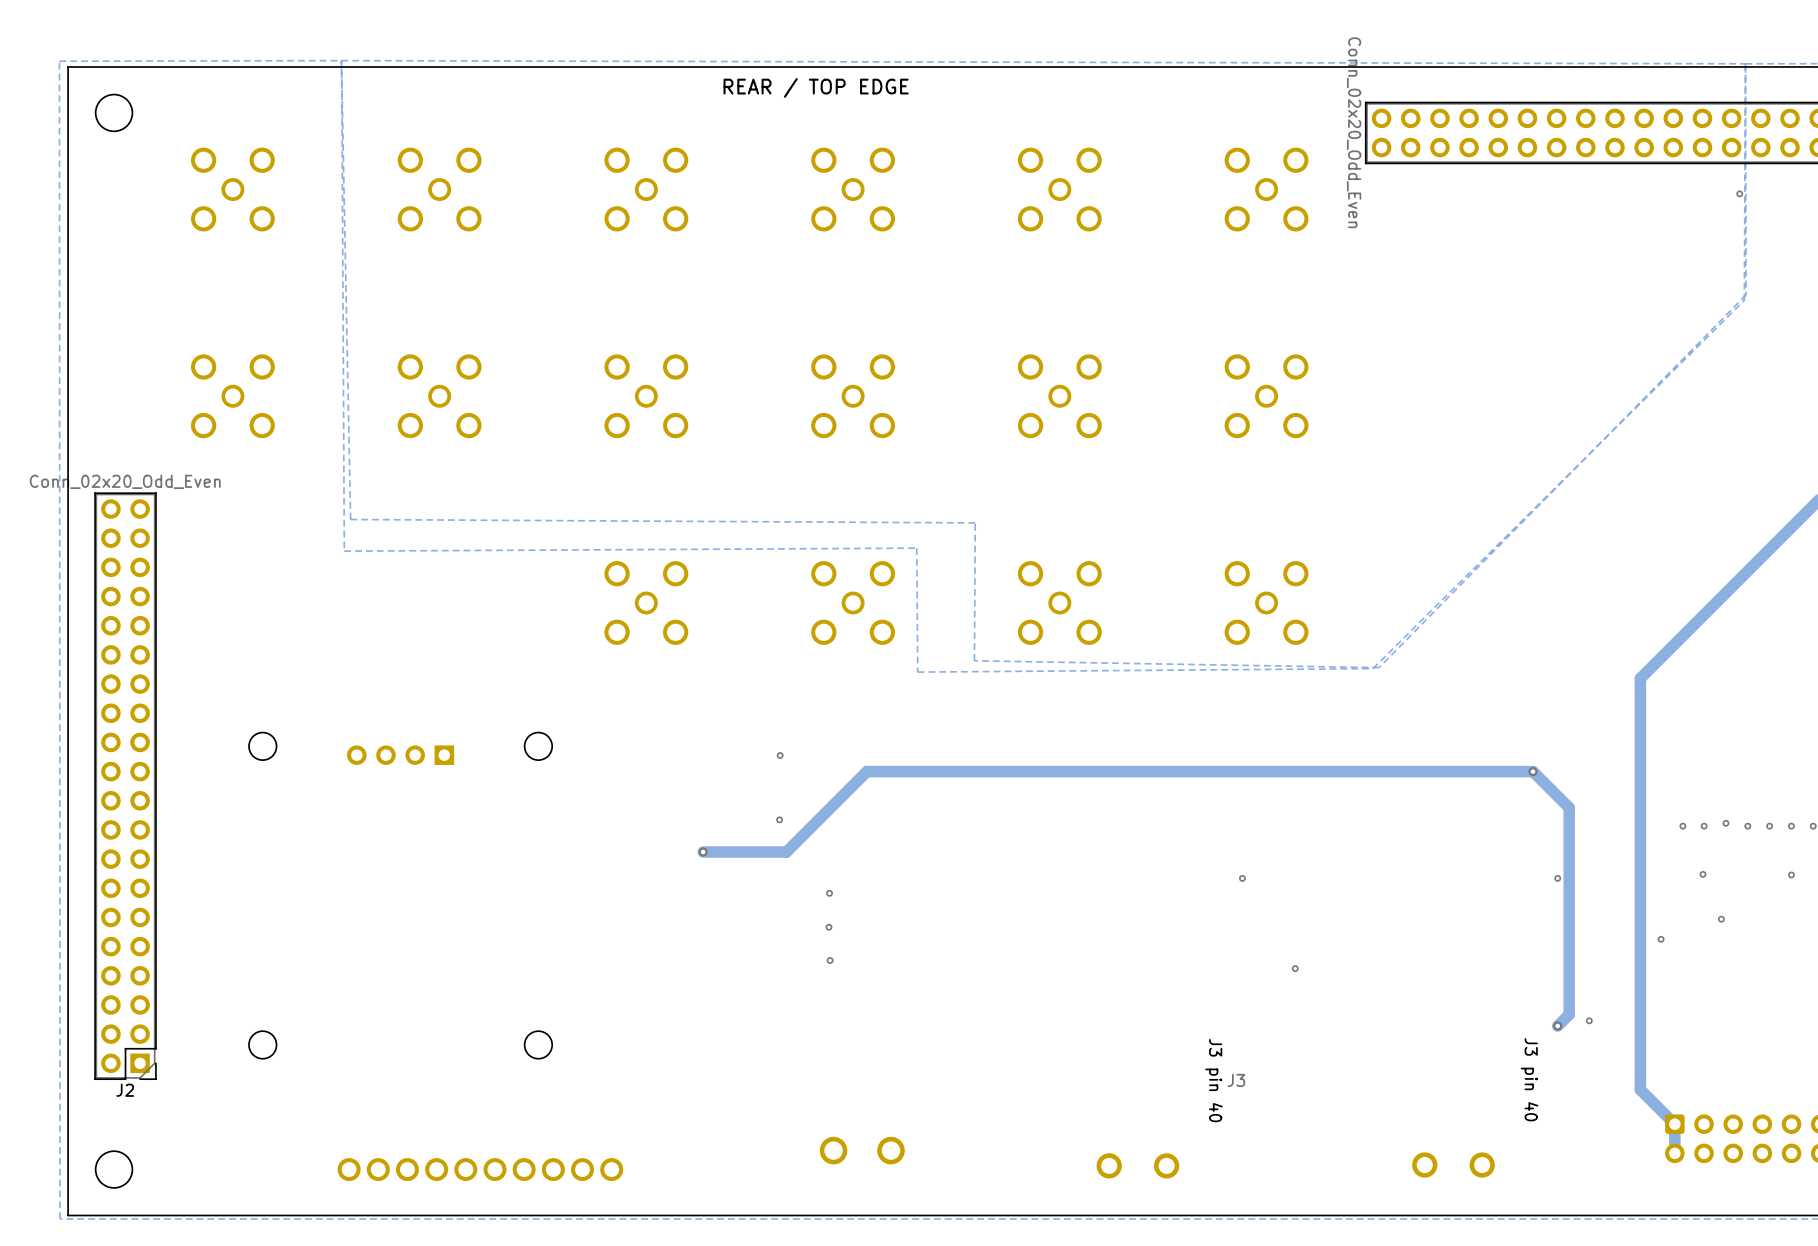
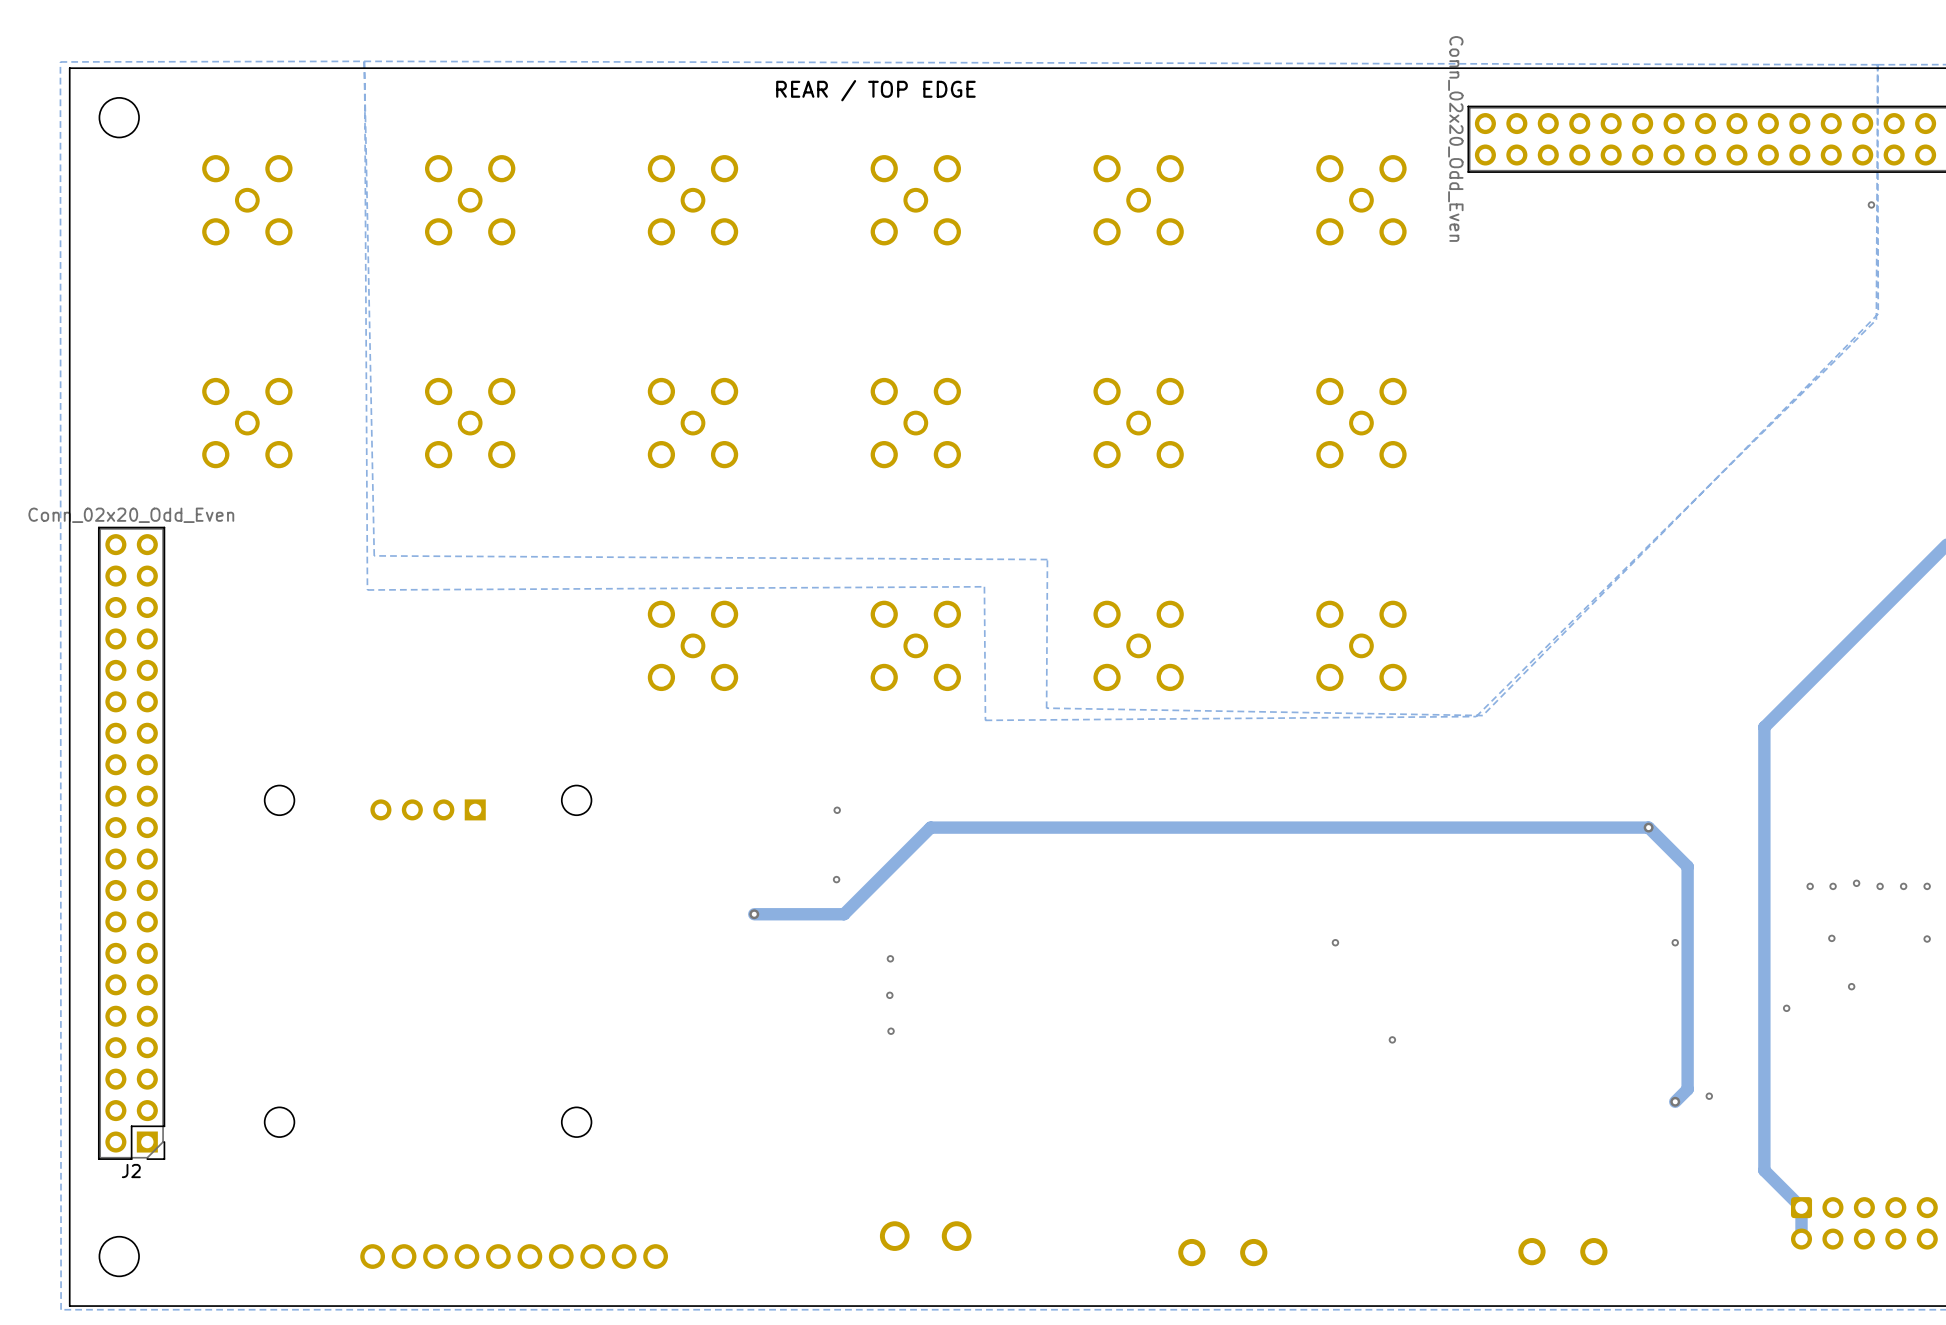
text: J3 pin 40 (1529, 1079) -> none
text: J3 pin 40 (1214, 1080) -> none
text: J3 (1236, 1080) -> none

